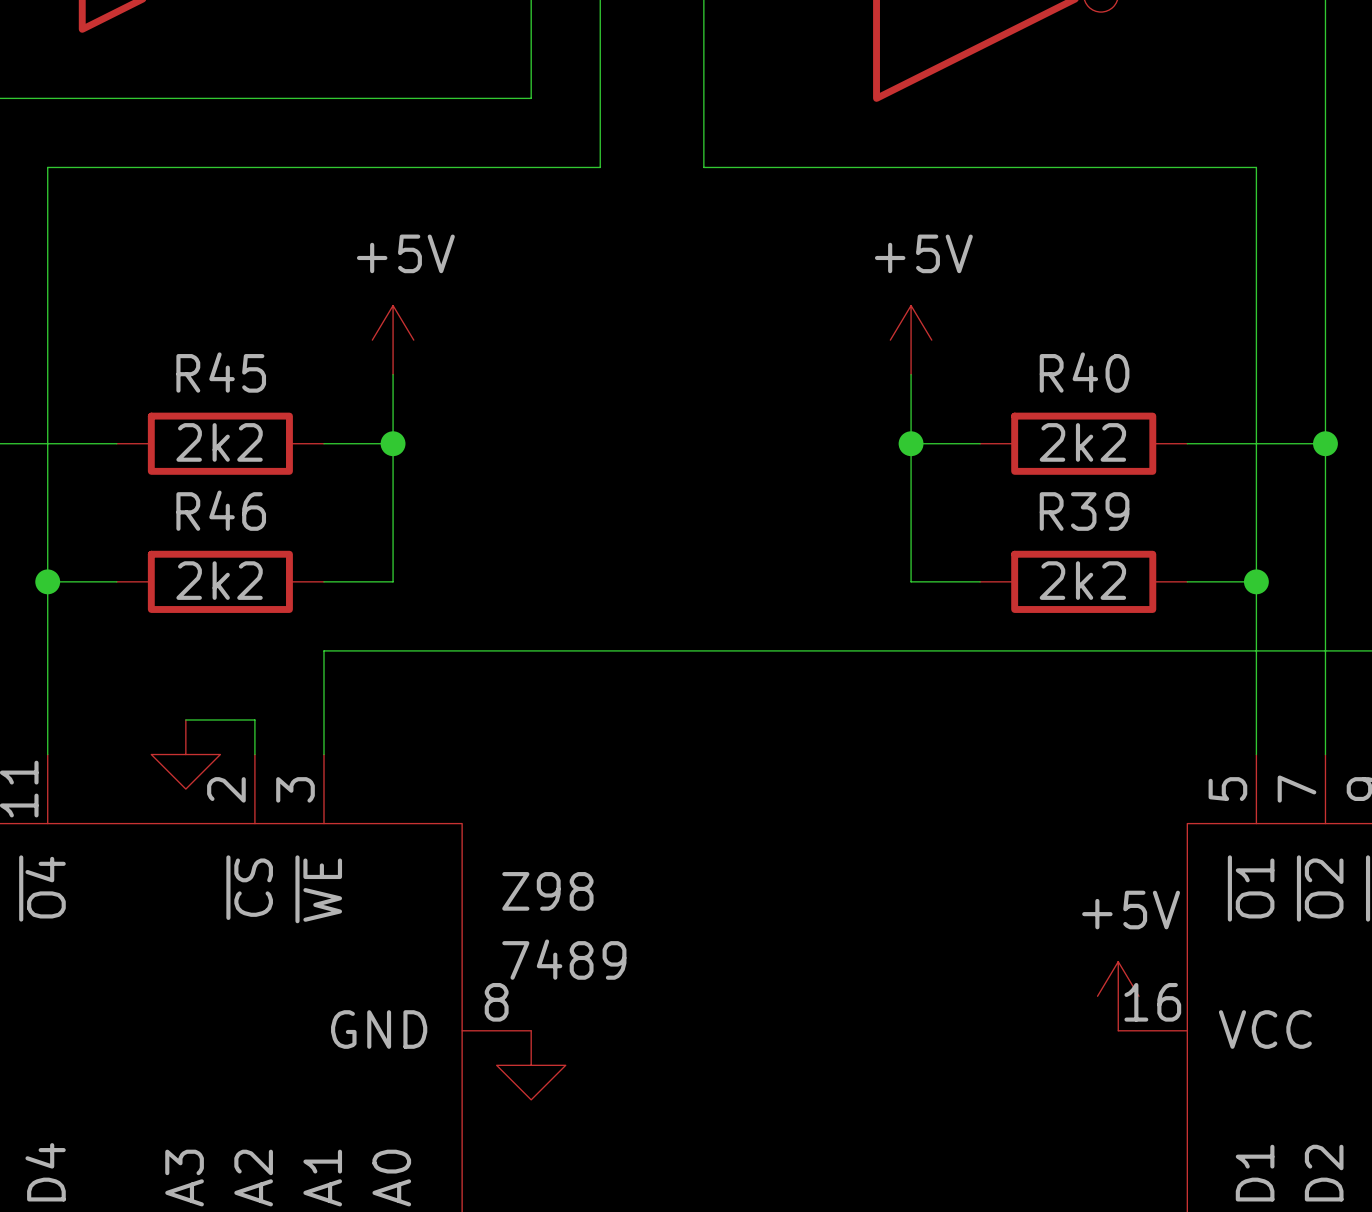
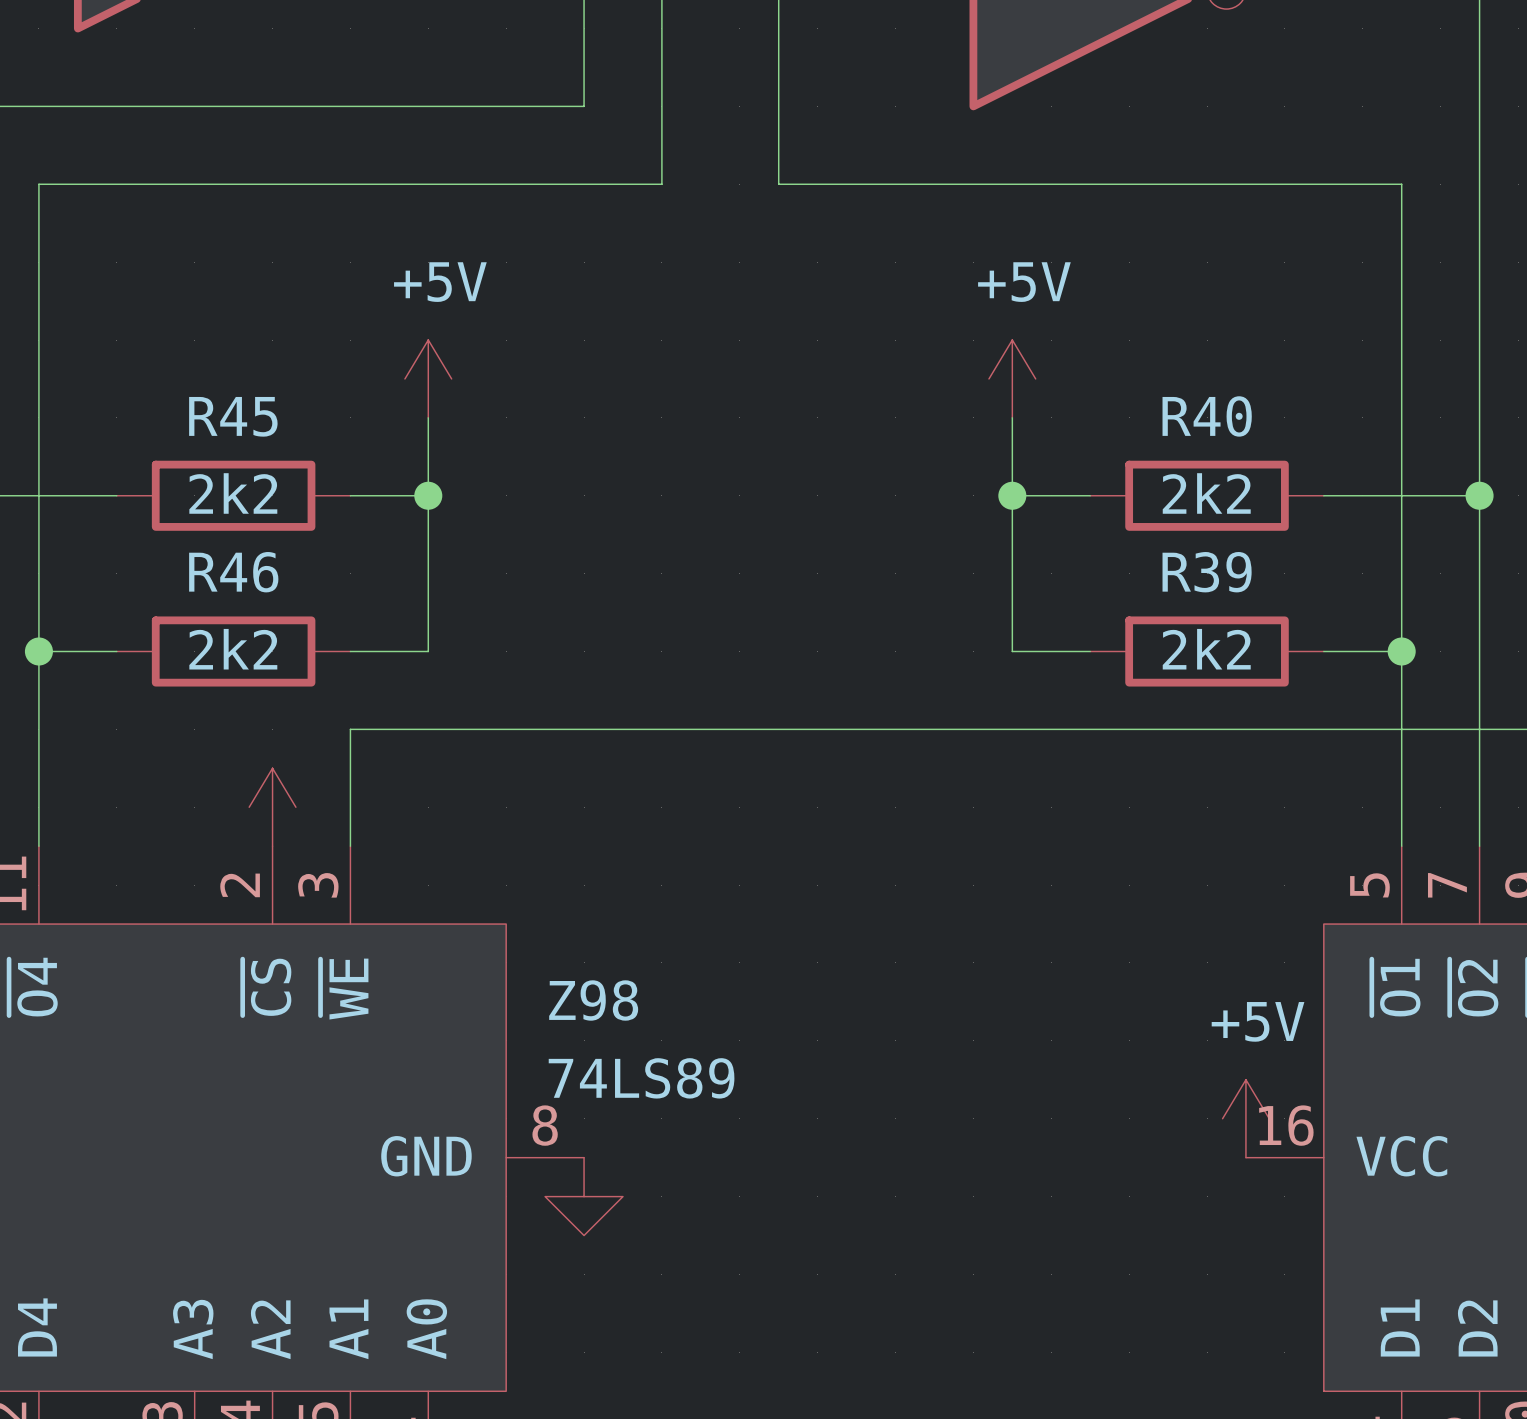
wire: (185, 719) (254, 719) (254, 754) -> none
power symbol: none -> (272, 807)
power symbol: (185, 754) -> none
Z98 value: 7489 (564, 959) -> 74LS89 (641, 1078)

